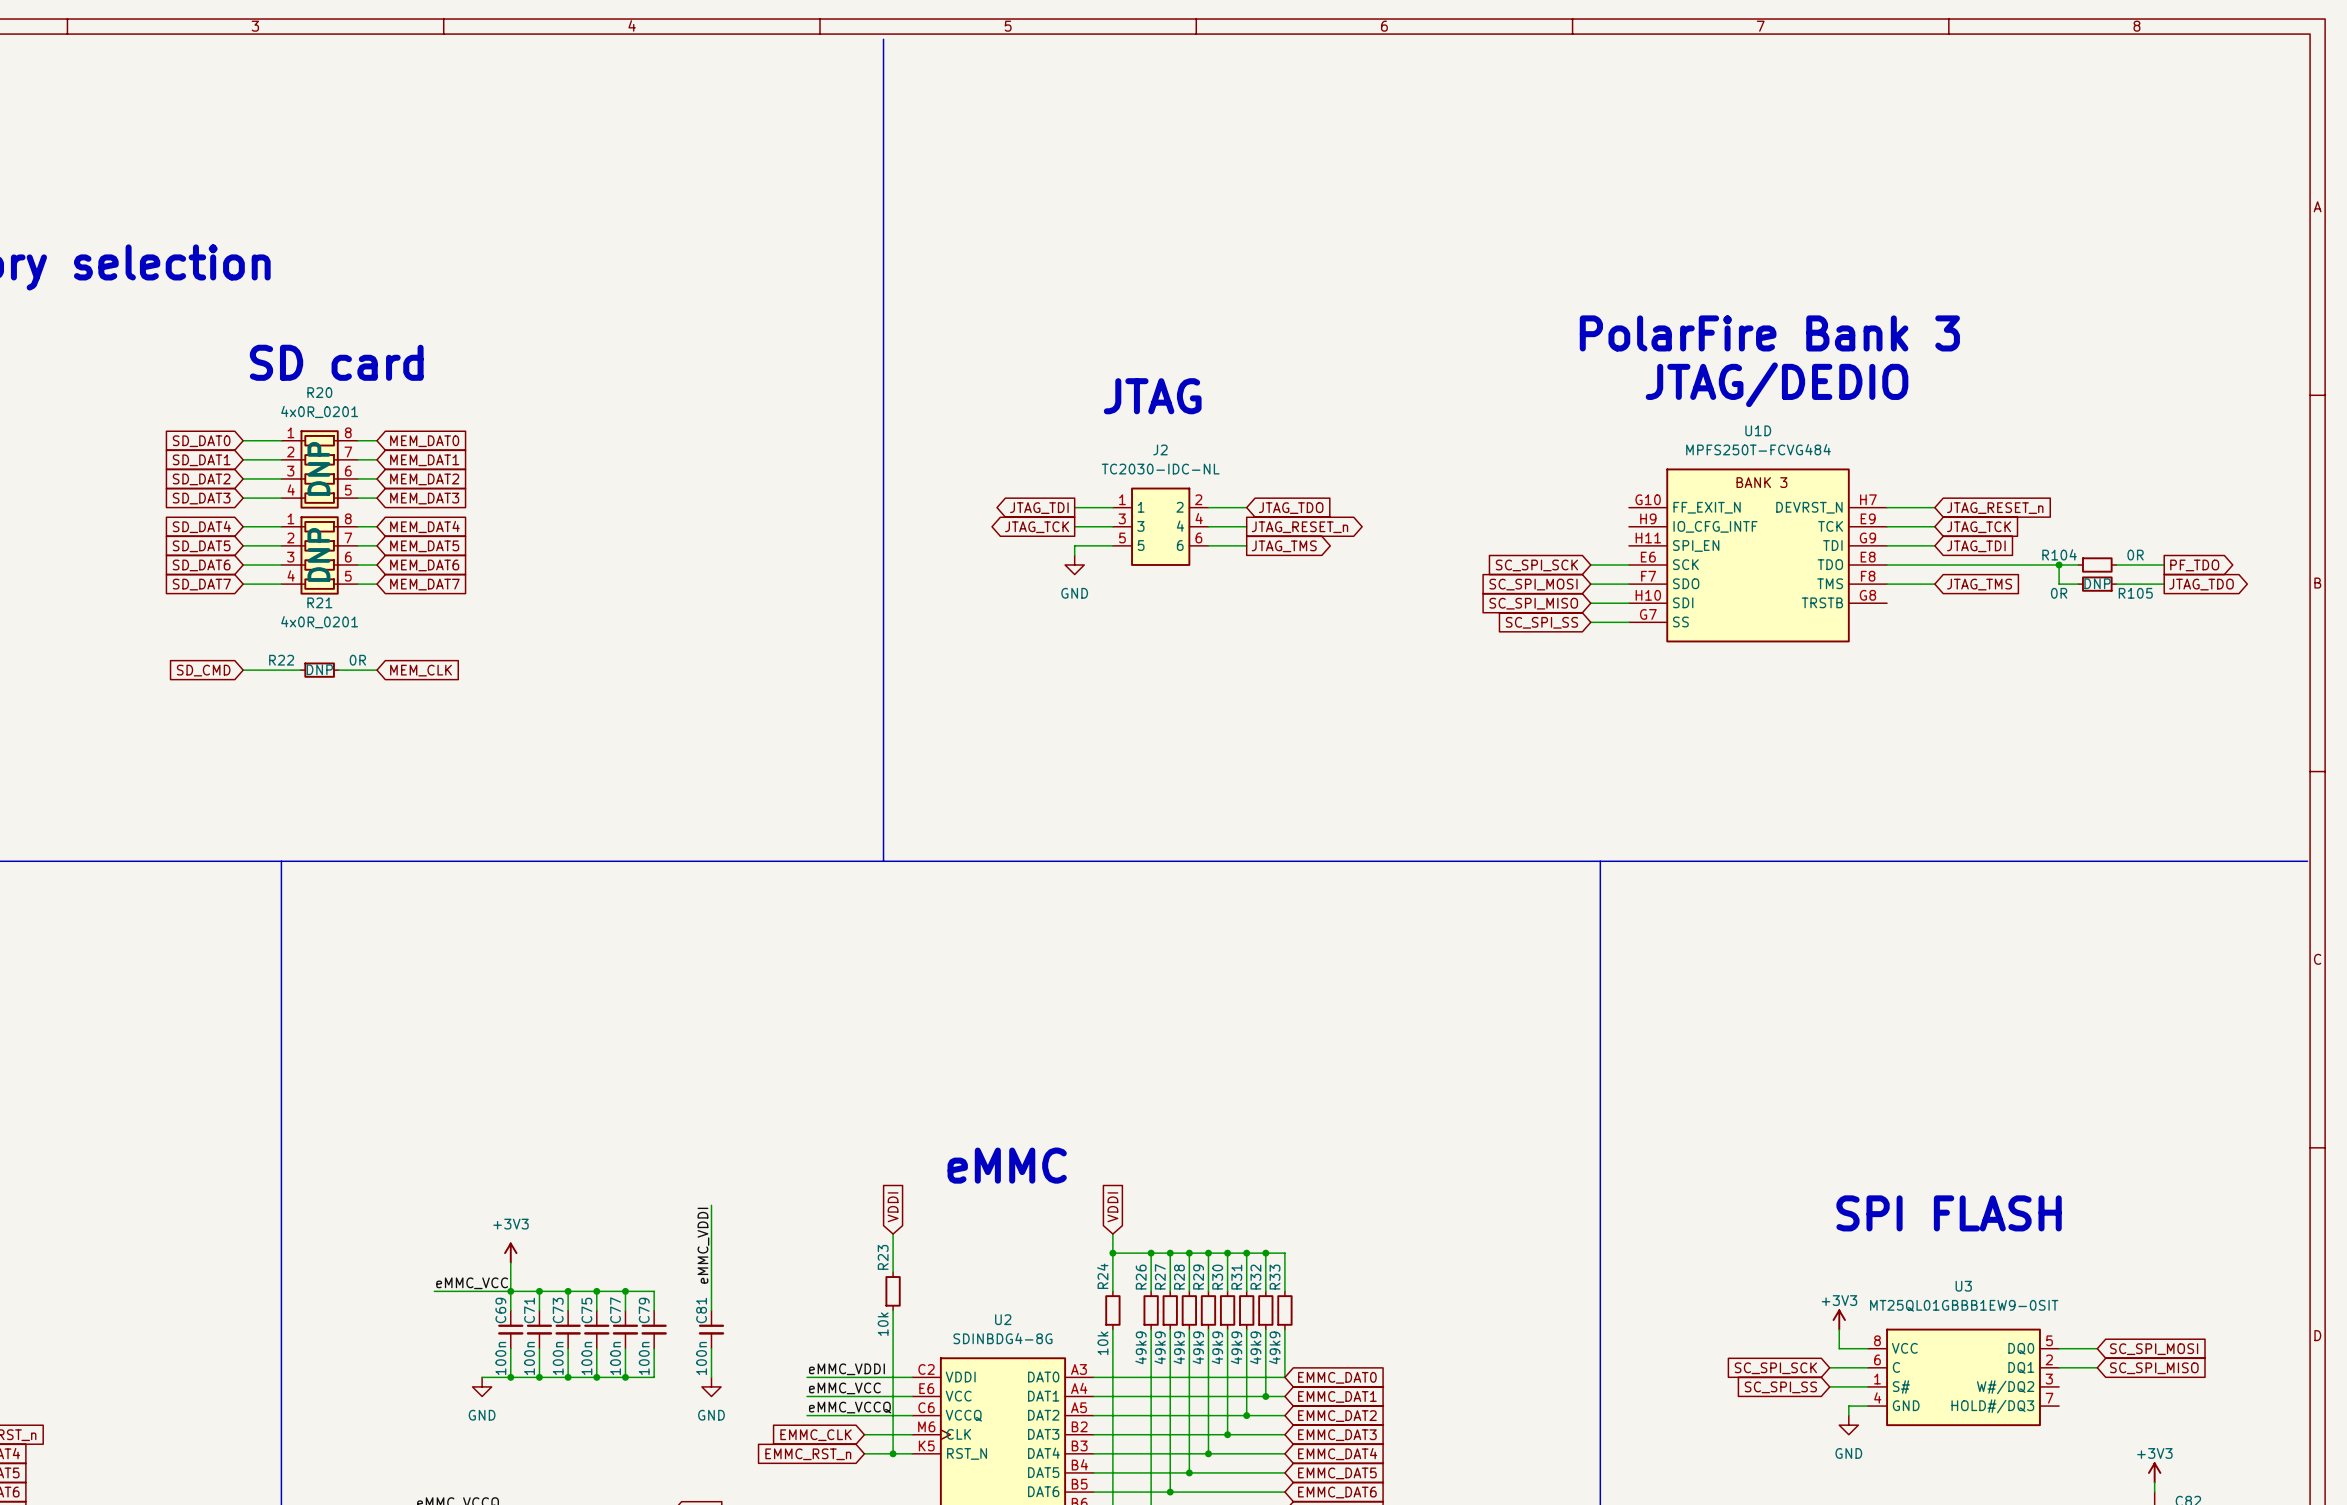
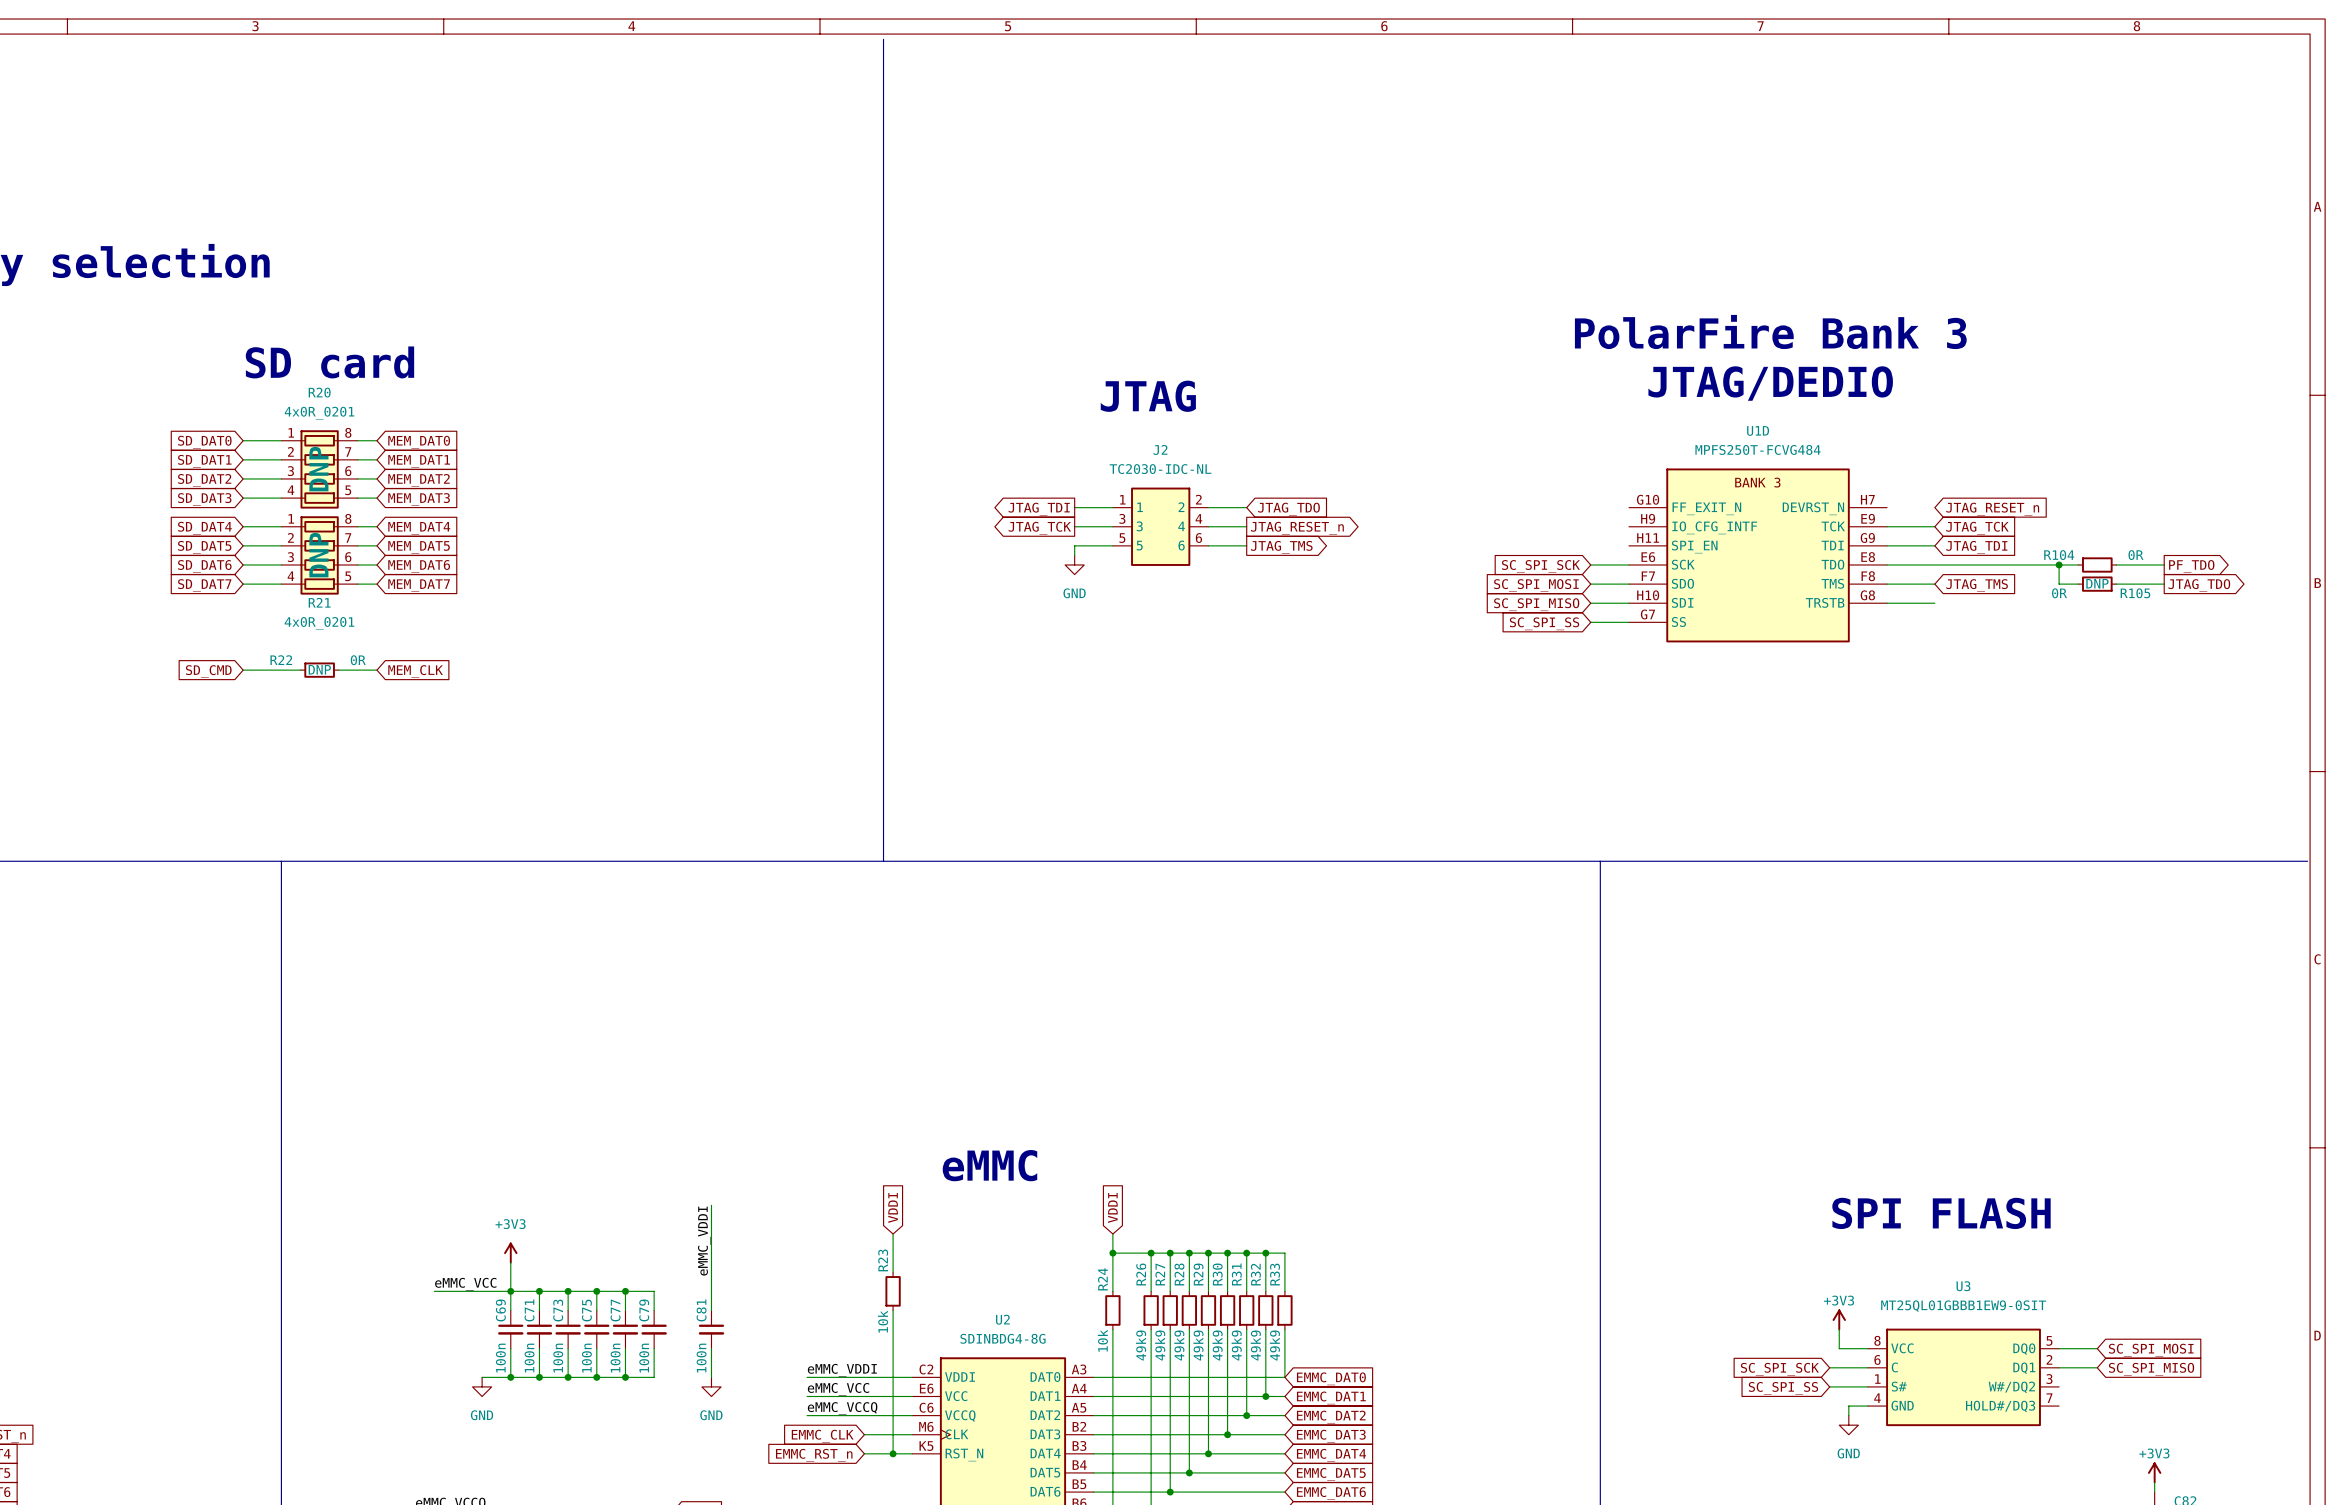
wire: (1887, 507) (1934, 507) -> (1887, 603) (1934, 603)

